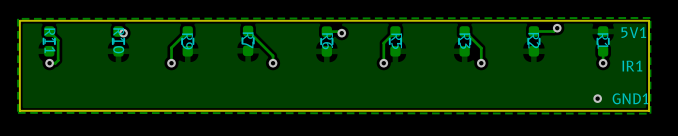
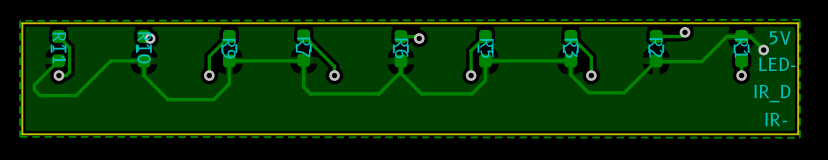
5V1 name: 5V1 (633, 32) -> 5V (780, 37)
track: none -> (763, 50) (750, 36) (727, 36) (701, 61) (656, 60) (624, 92) (588, 92) (570, 74) (570, 60) (485, 60) (485, 80) (471, 93) (421, 93) (400, 73) (400, 61)
track: none -> (58, 60) (34, 85) (34, 89) (40, 95) (75, 95) (110, 60) (143, 60) (143, 75) (167, 99) (213, 99) (229, 83) (229, 60) (303, 60) (303, 87) (310, 93) (378, 93) (400, 71)
LED-: none -> (777, 64)
IR1: (632, 66) -> none
IR_D: none -> (772, 93)
via position: (597, 98) -> (763, 50)
GND1 name: GND1 (630, 98) -> IR- (776, 119)

